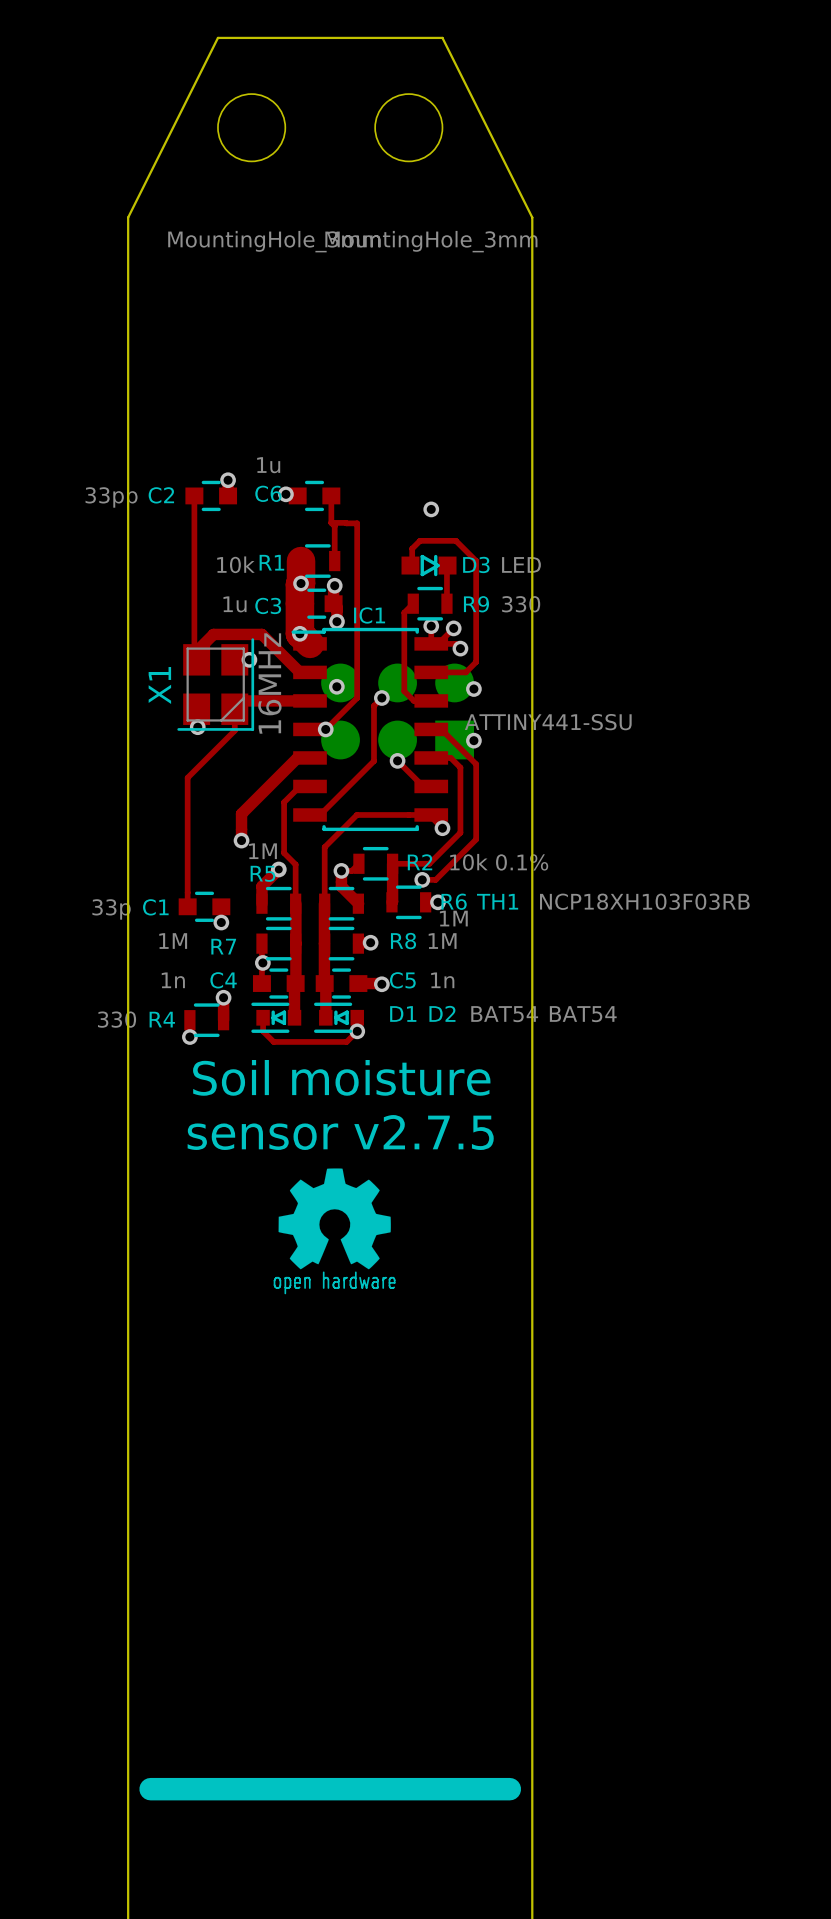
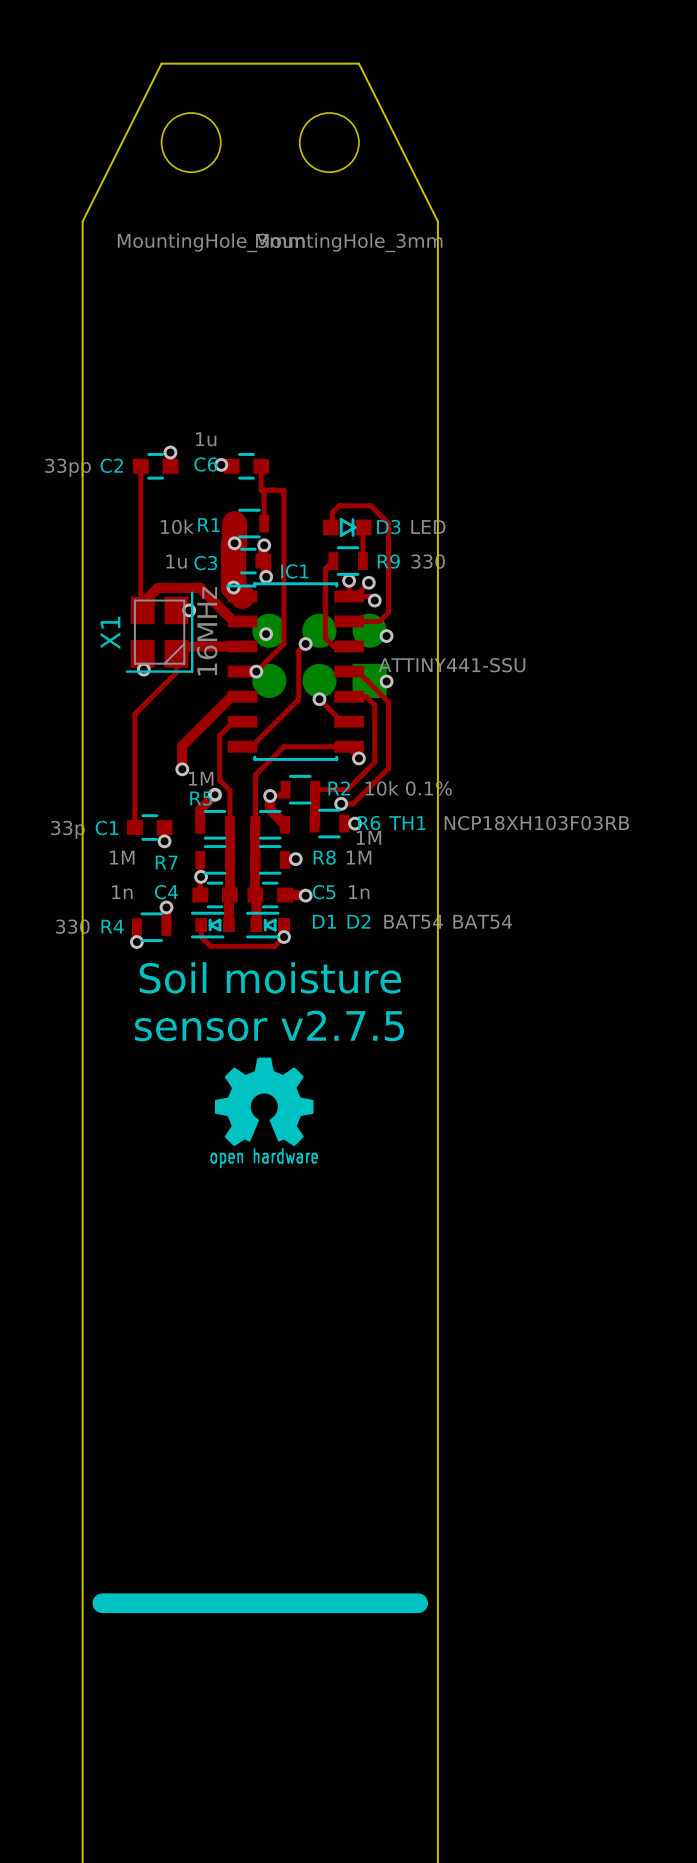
via: (431, 509) -> none

